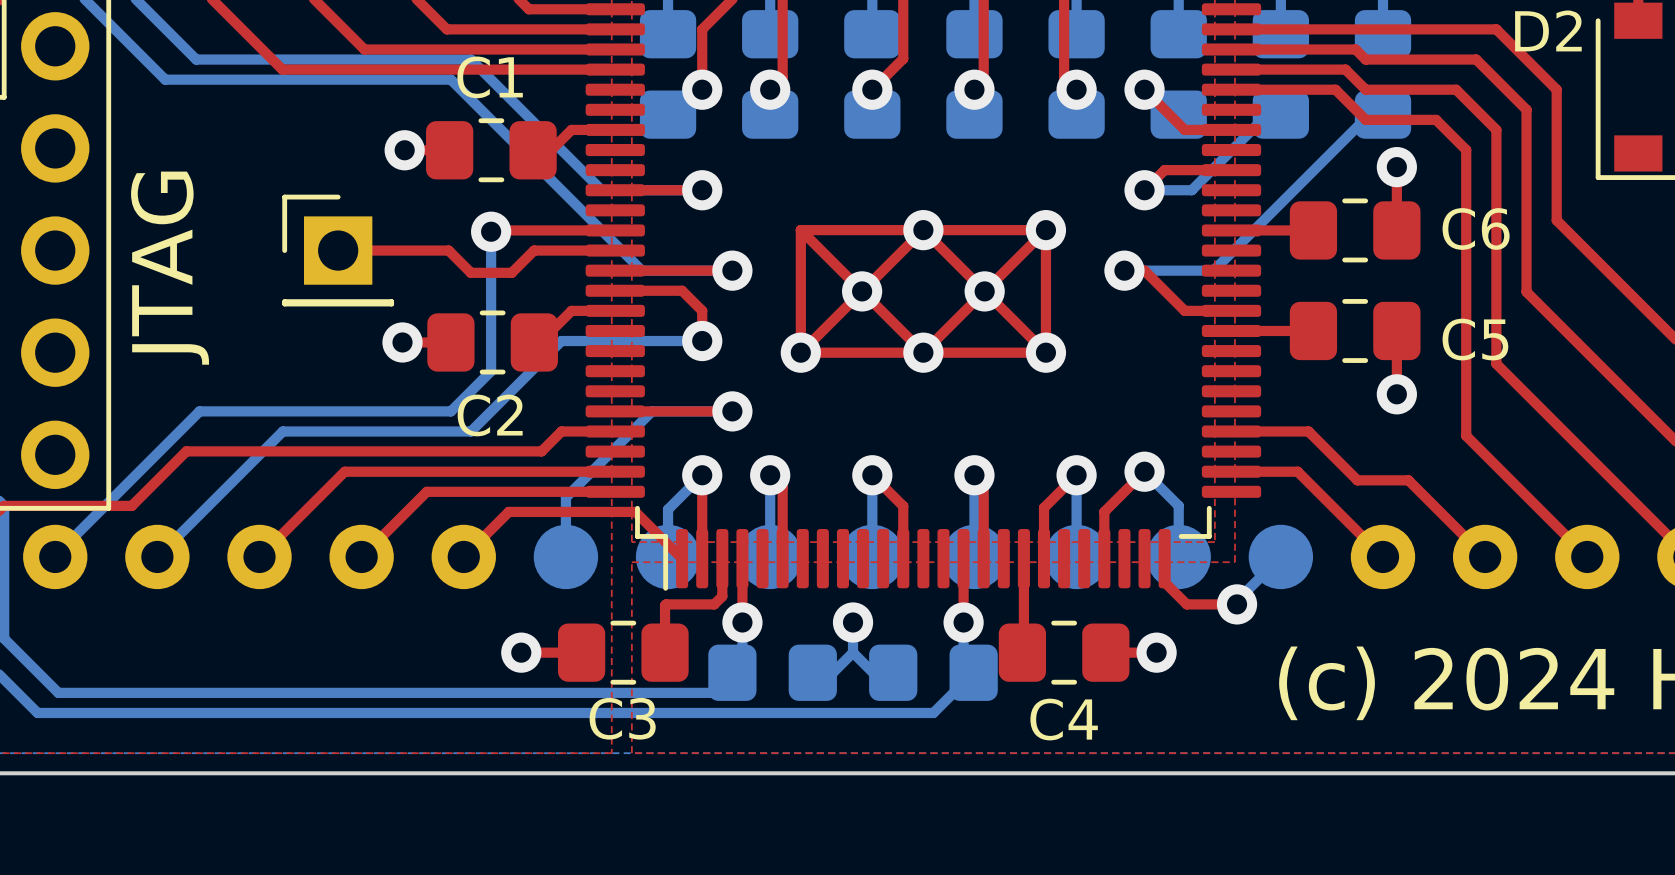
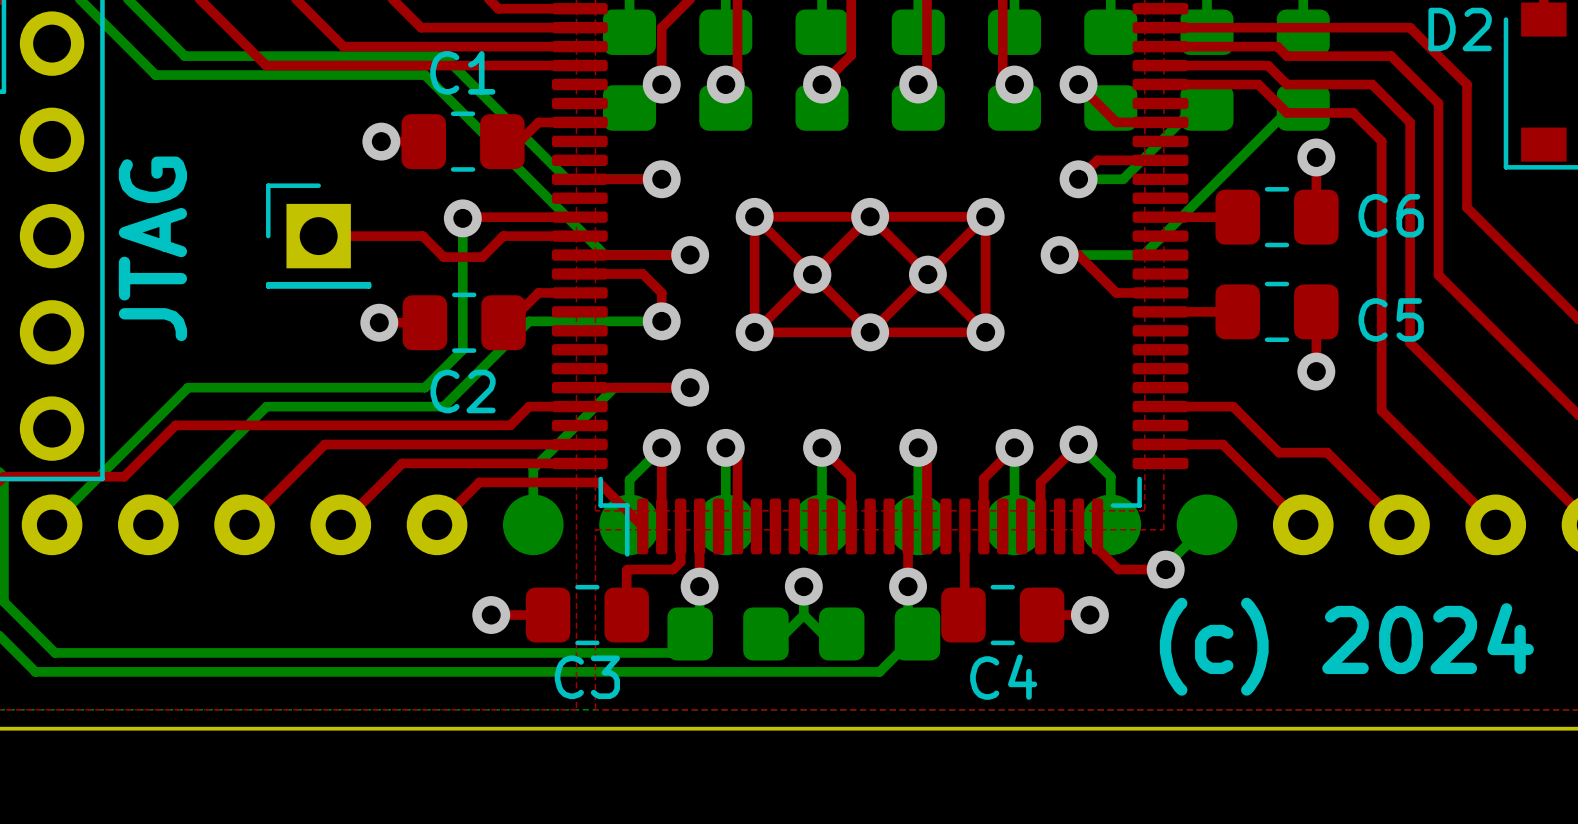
via: none -> (754, 216)

